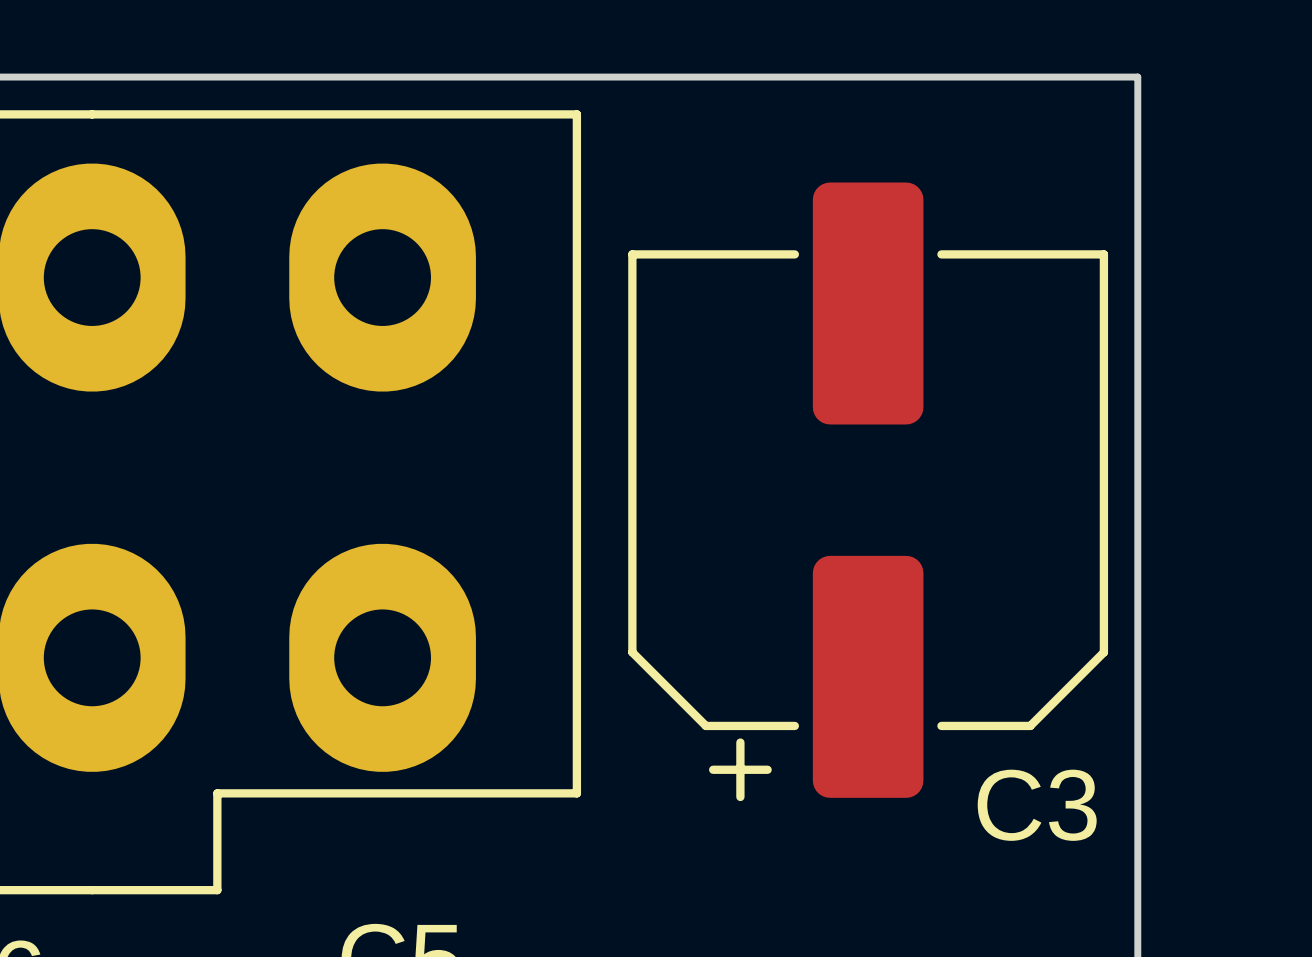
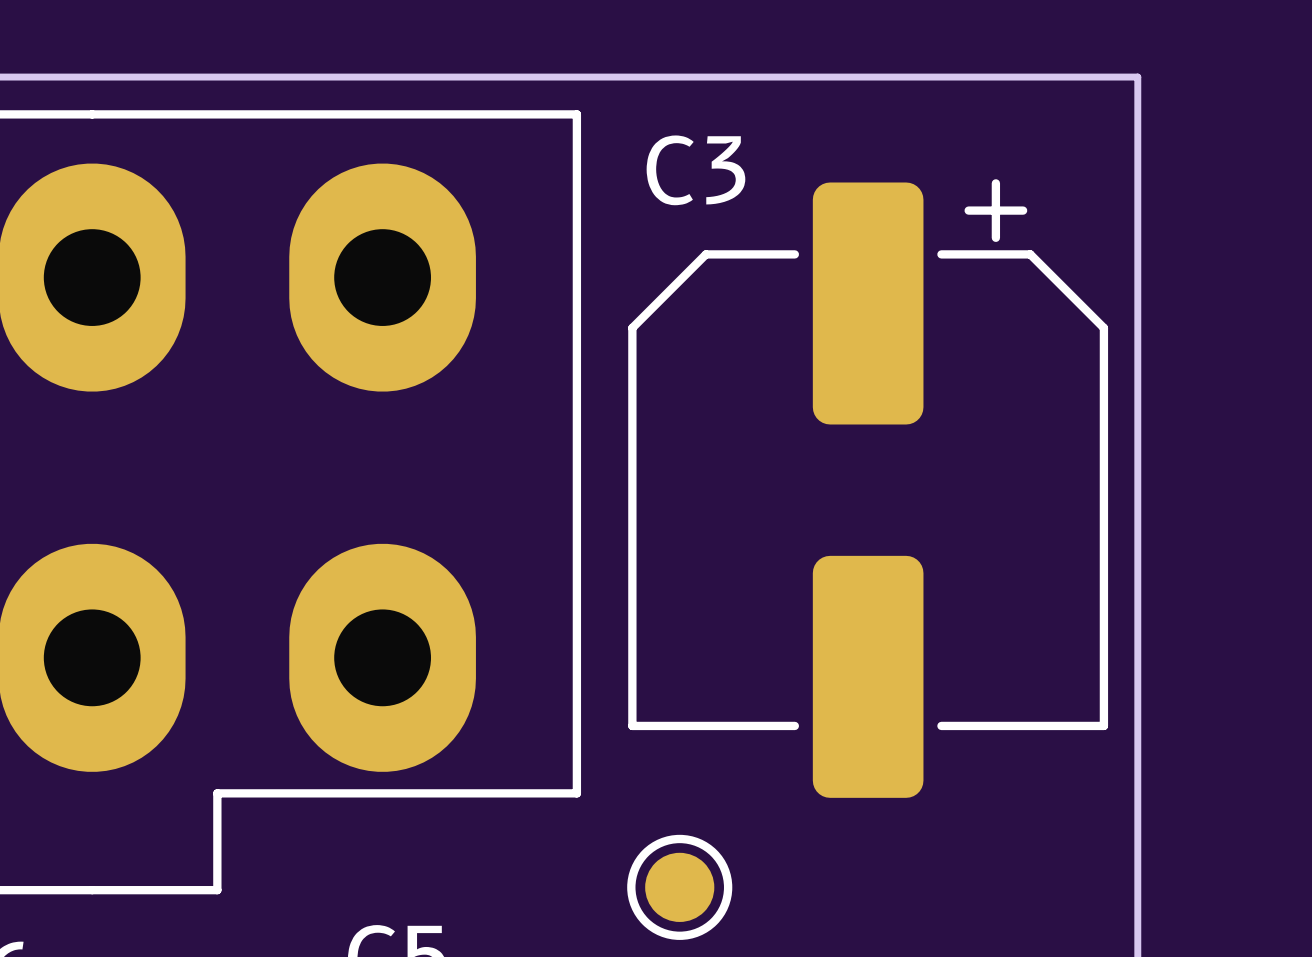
C3 rotation: 0° (868, 491) -> 180° (868, 488)
part: none -> (679, 887)

